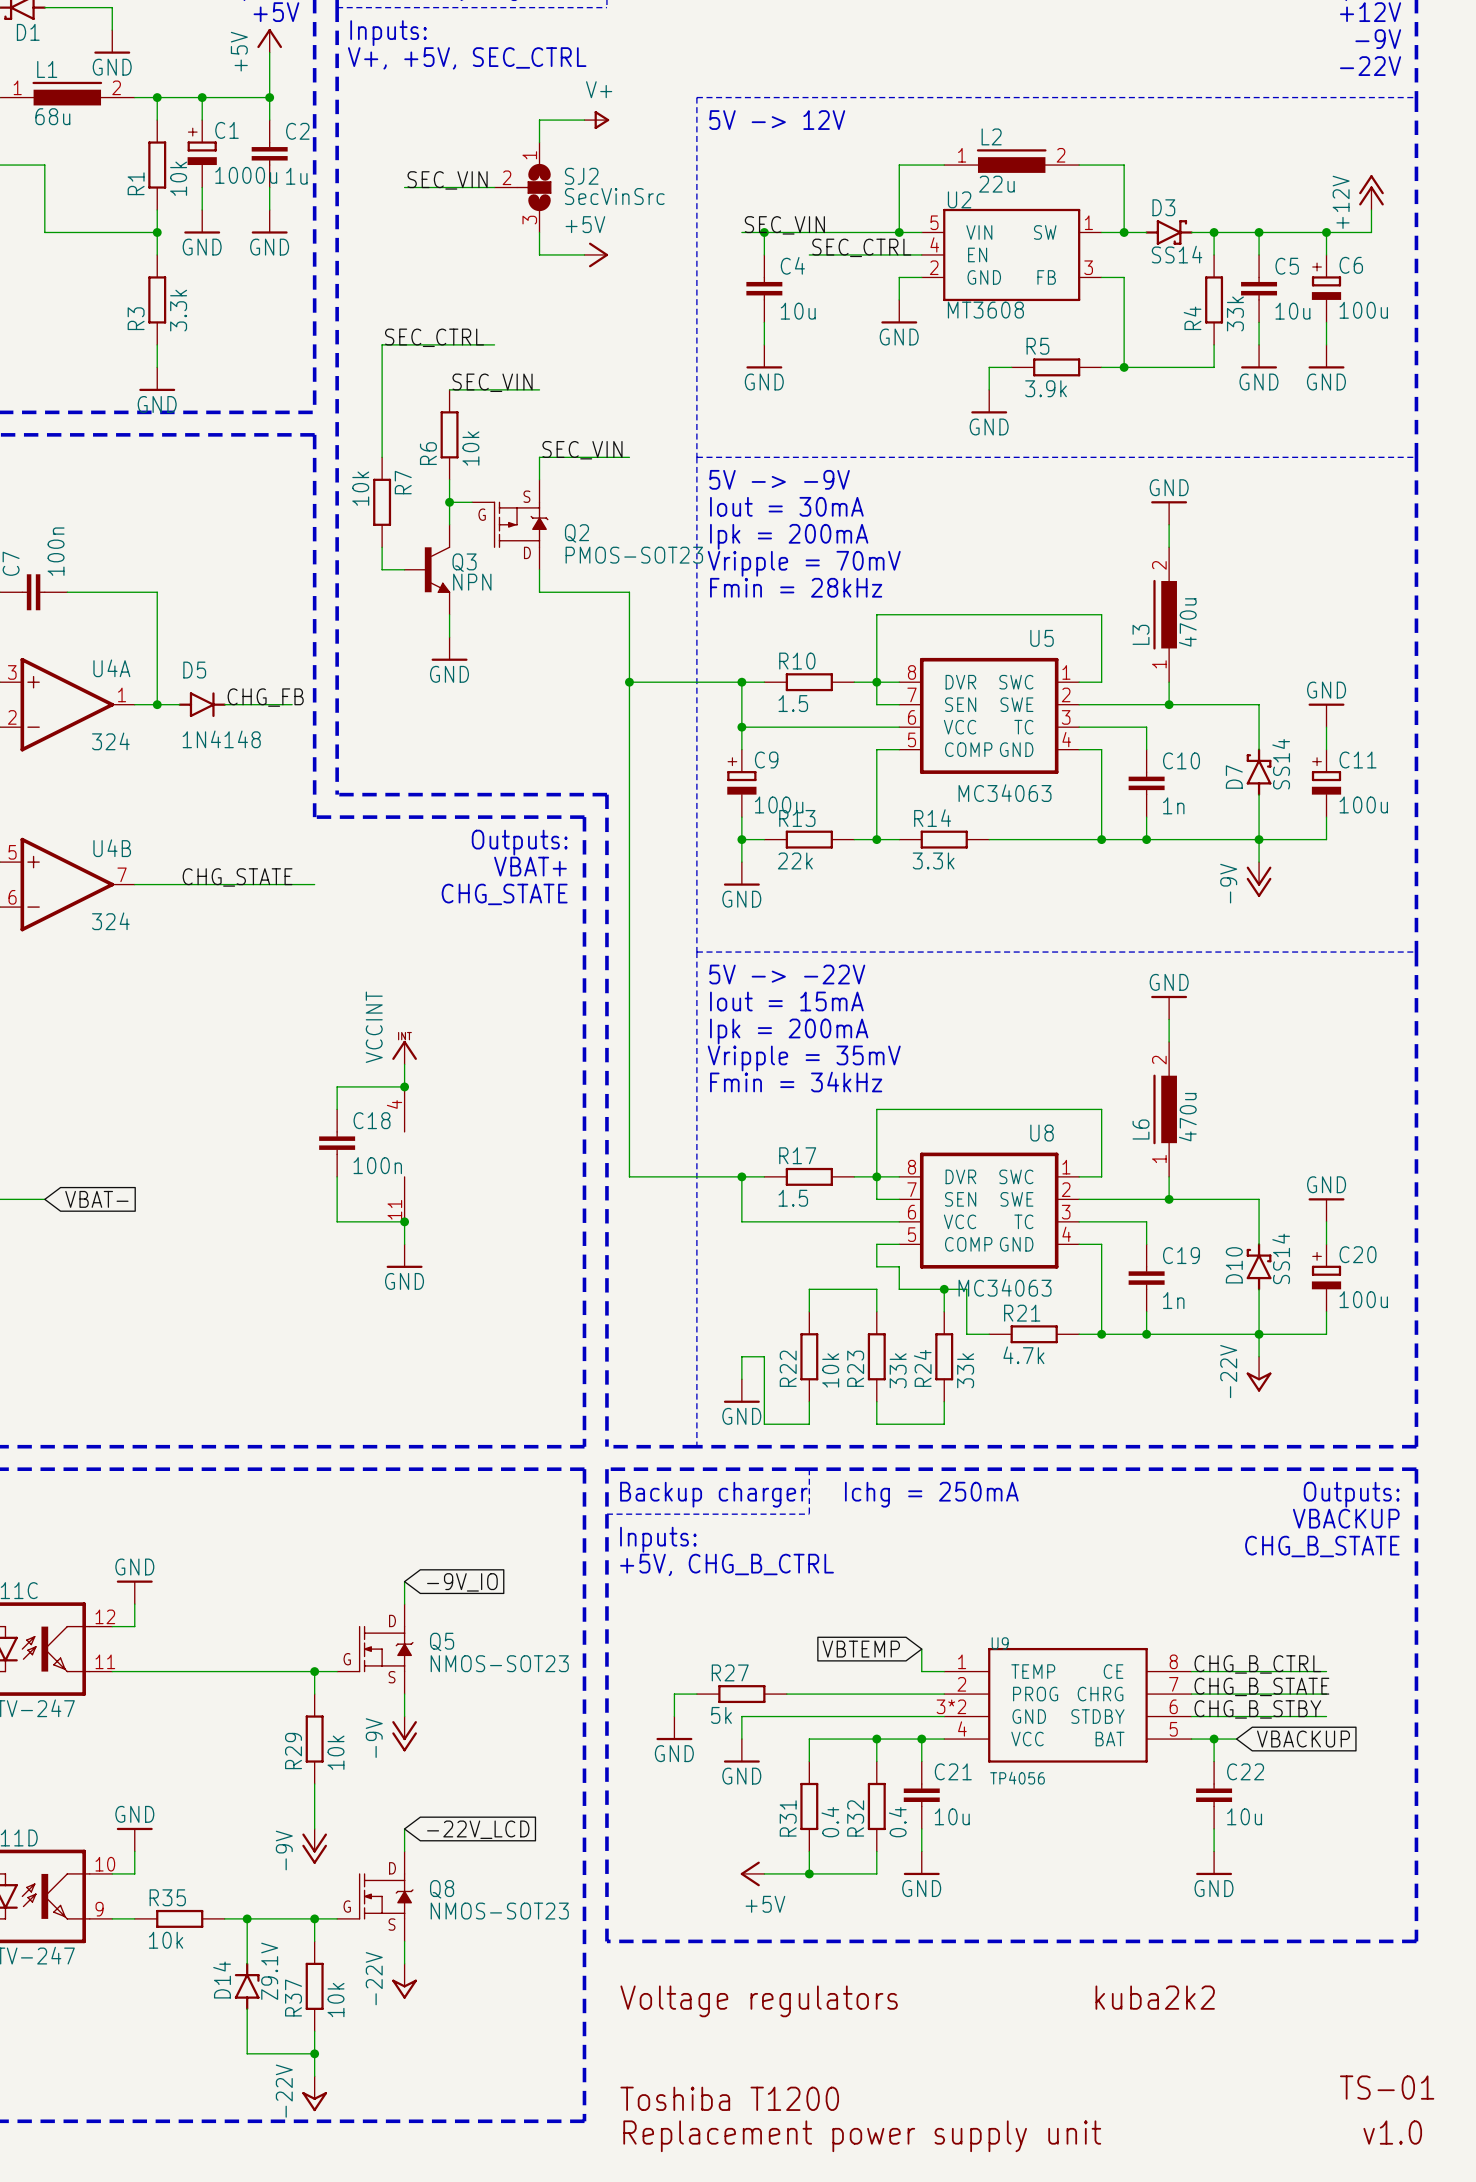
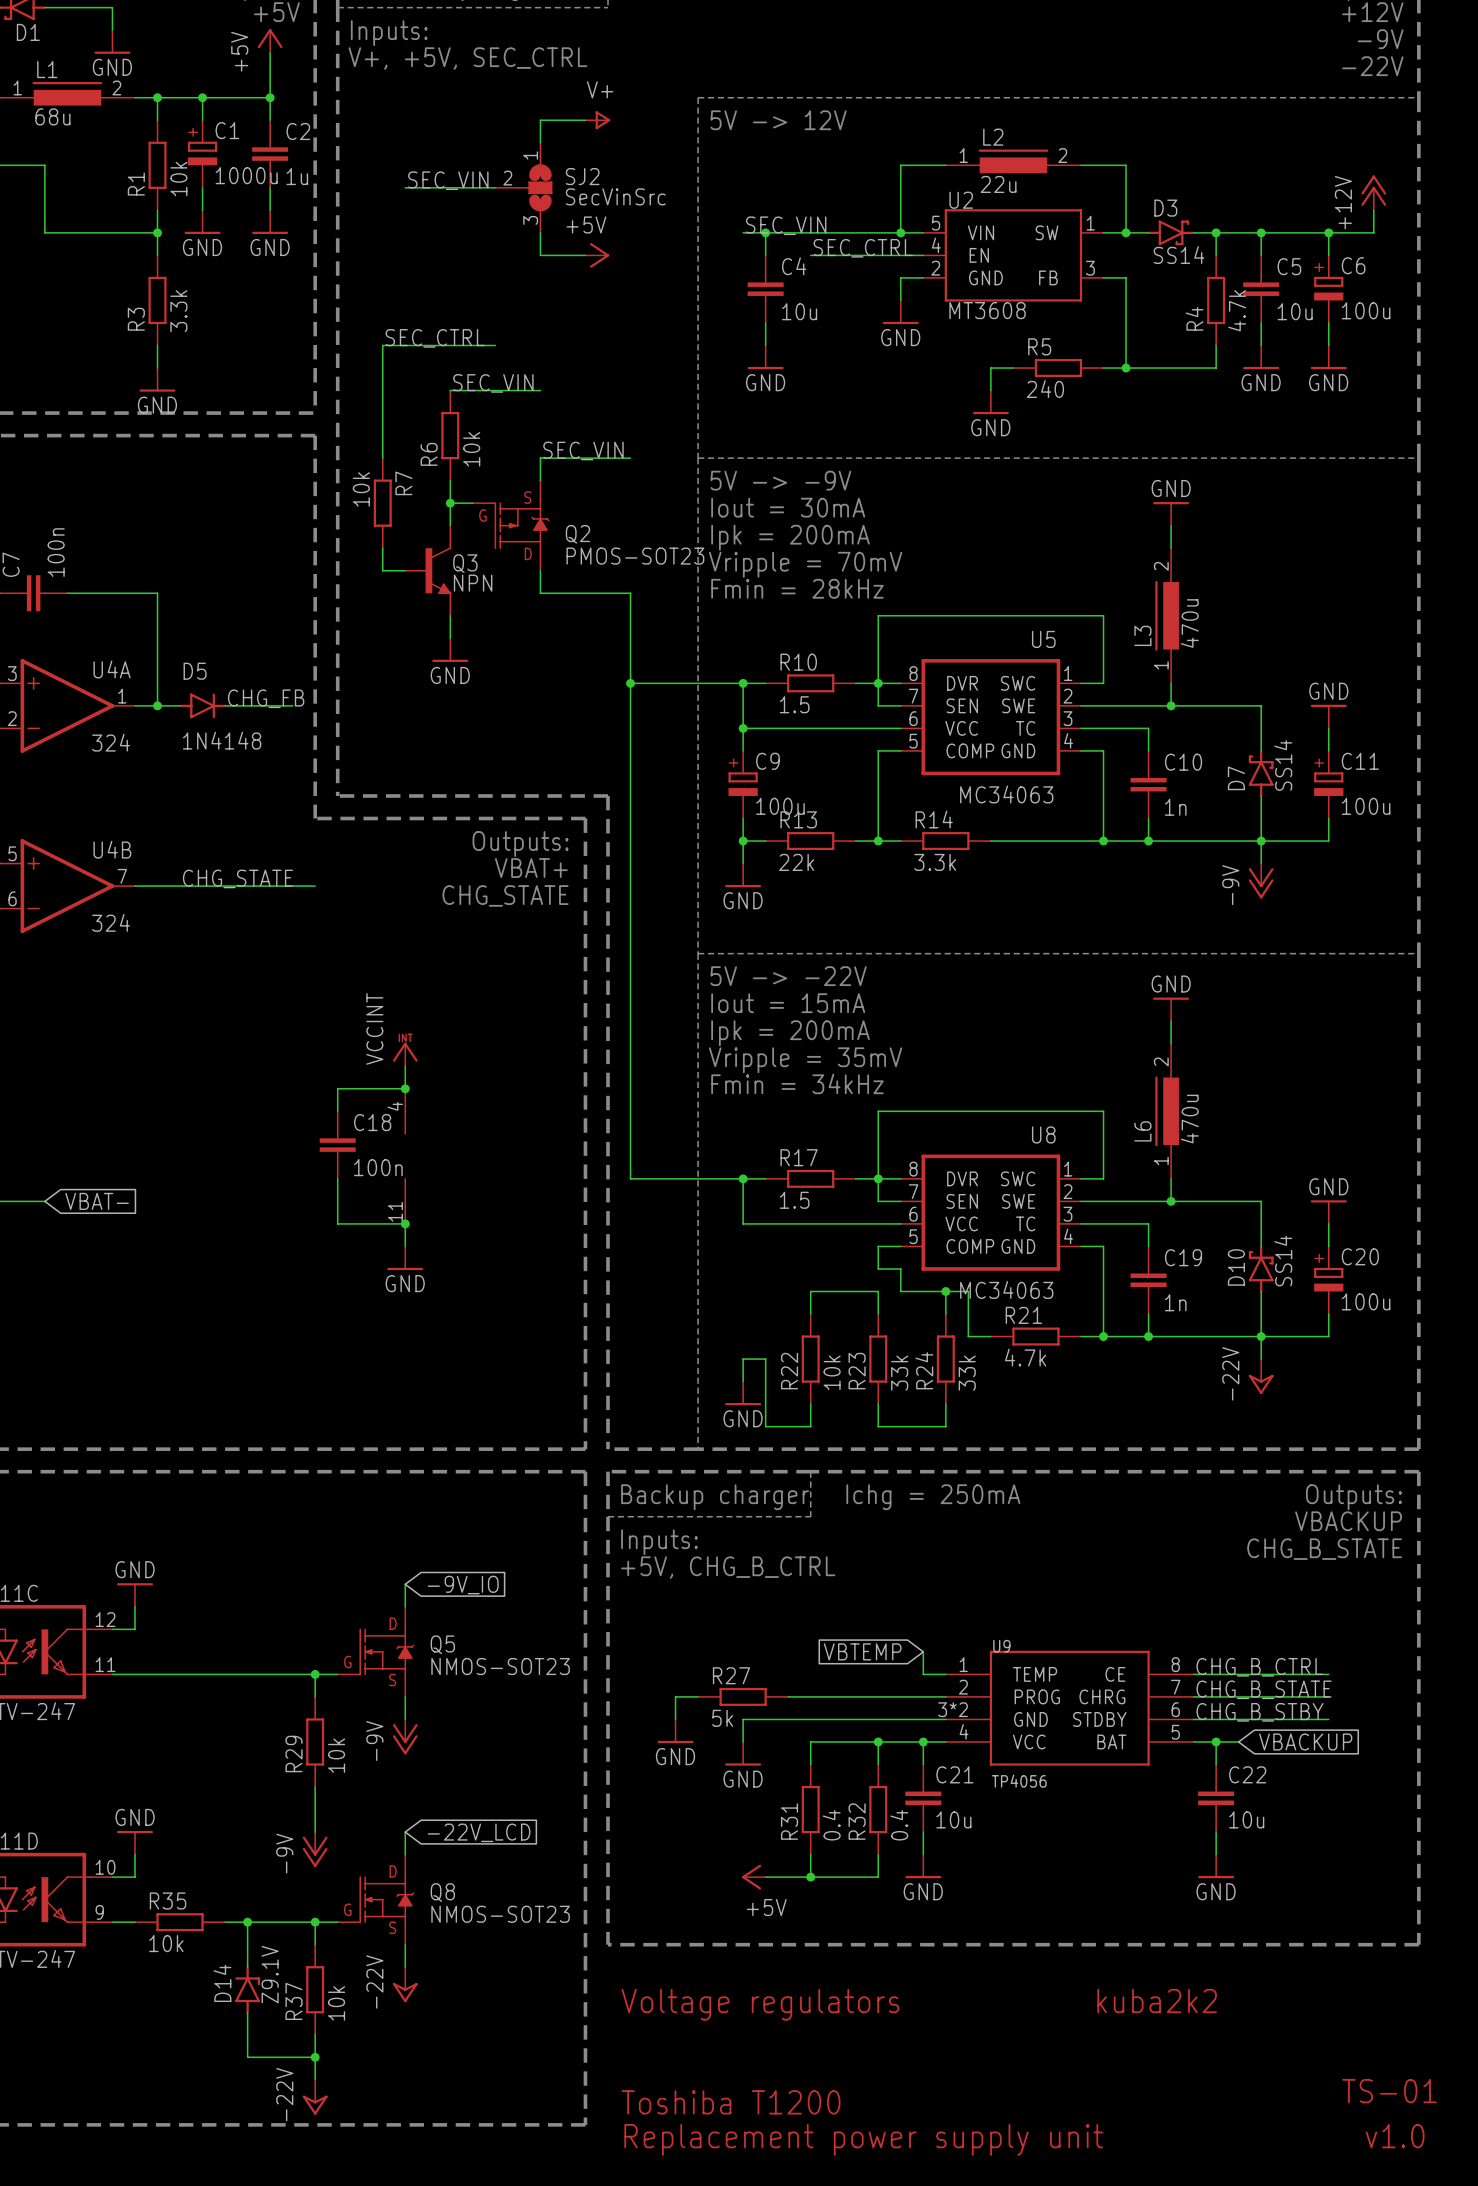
R4 value: 33k (1235, 313) -> 4.7k (1237, 310)
R5 value: 3.9k (1046, 388) -> 240 (1045, 389)

